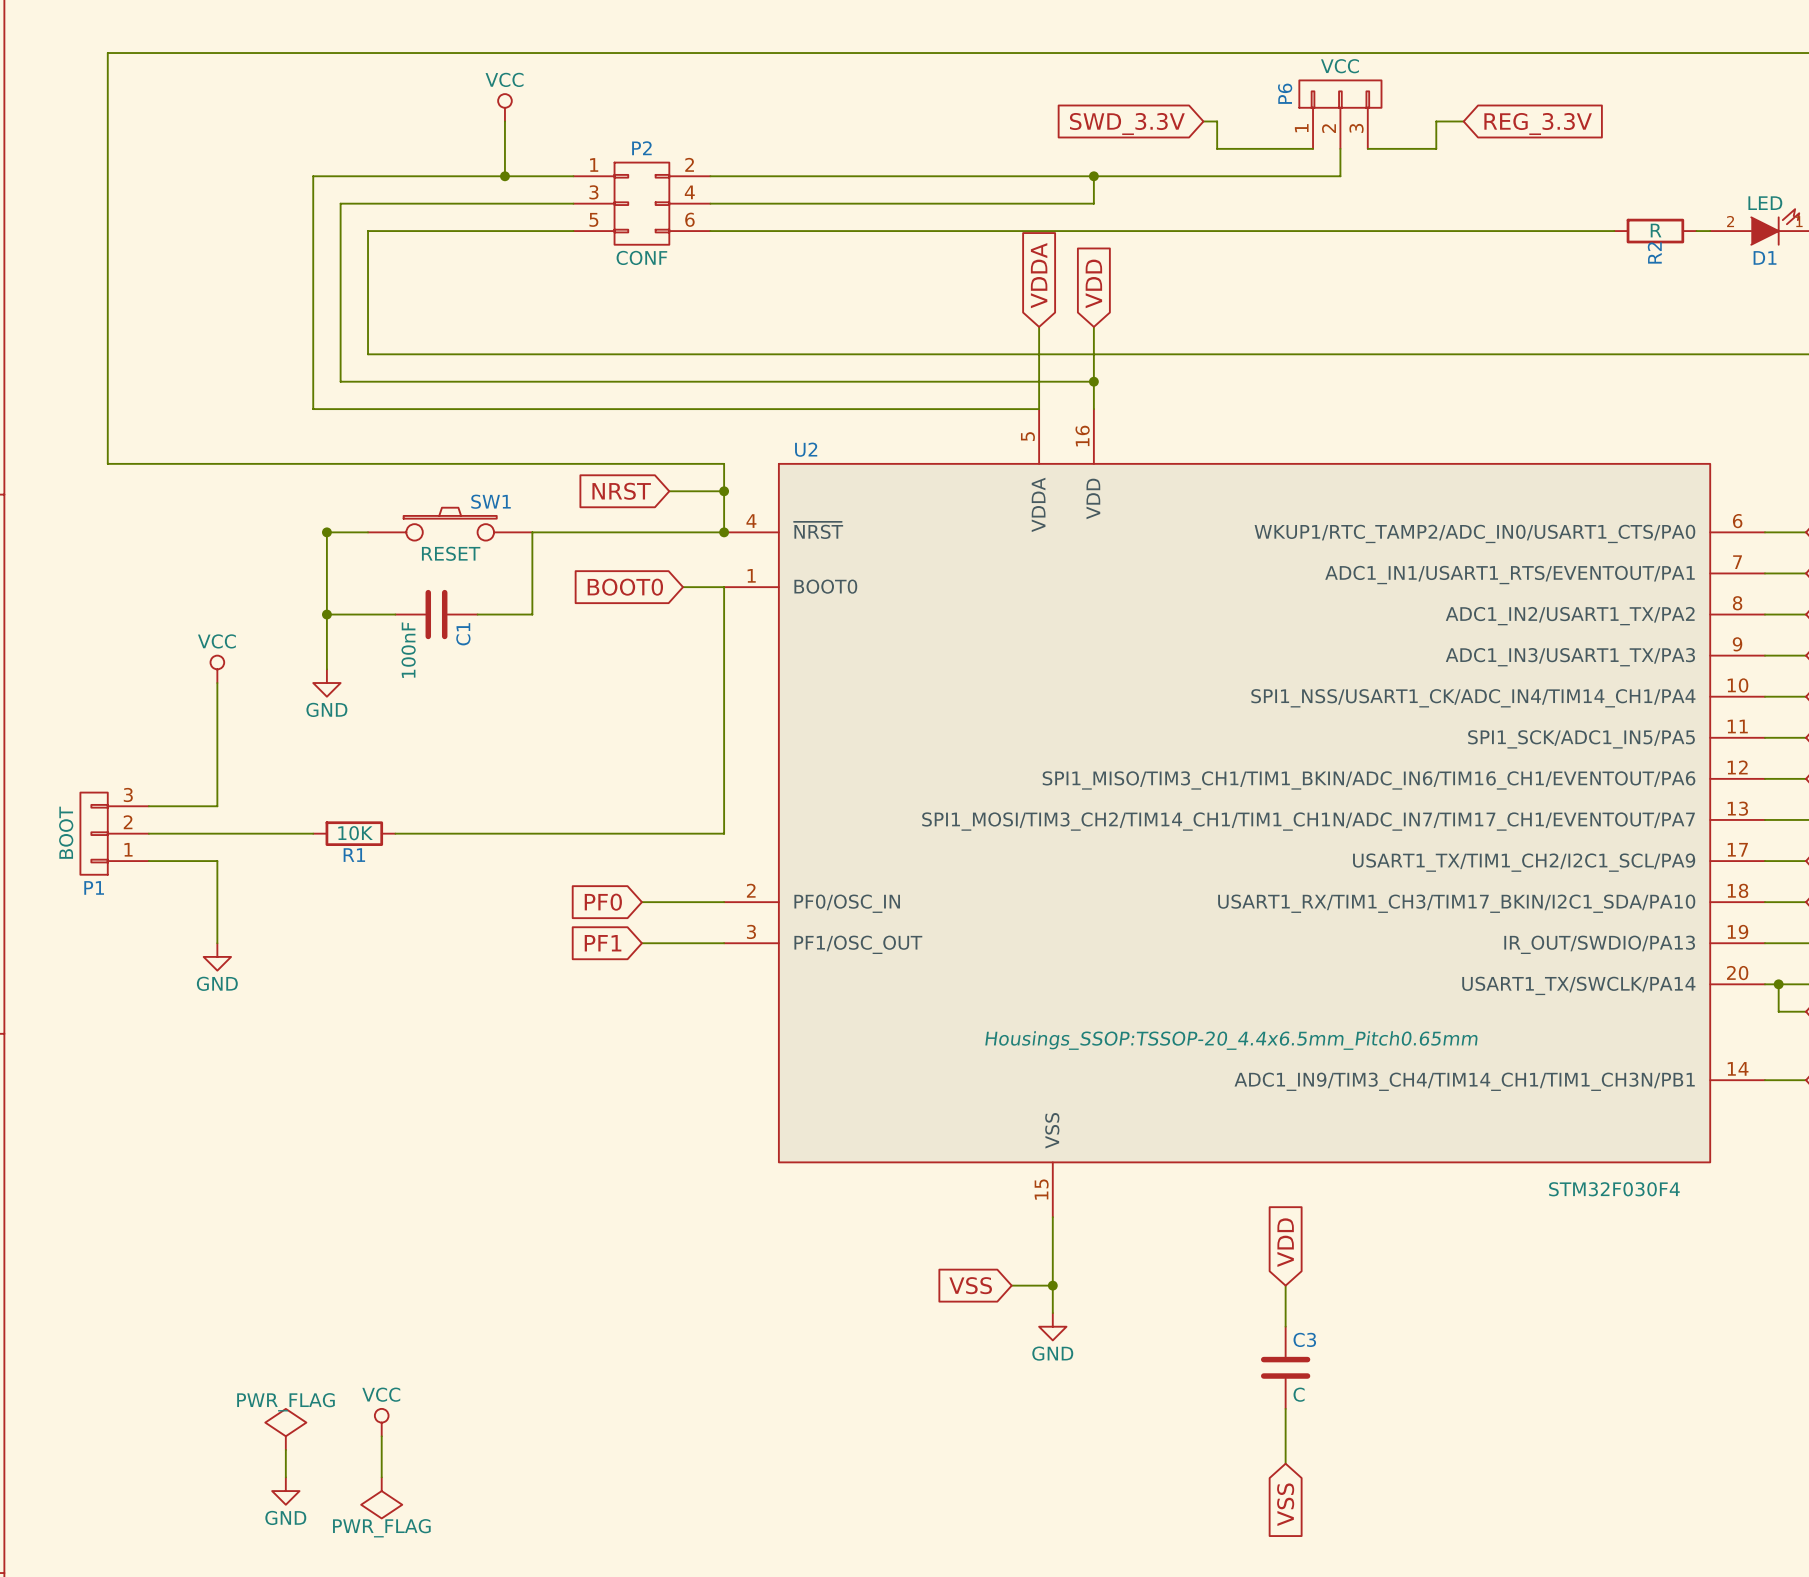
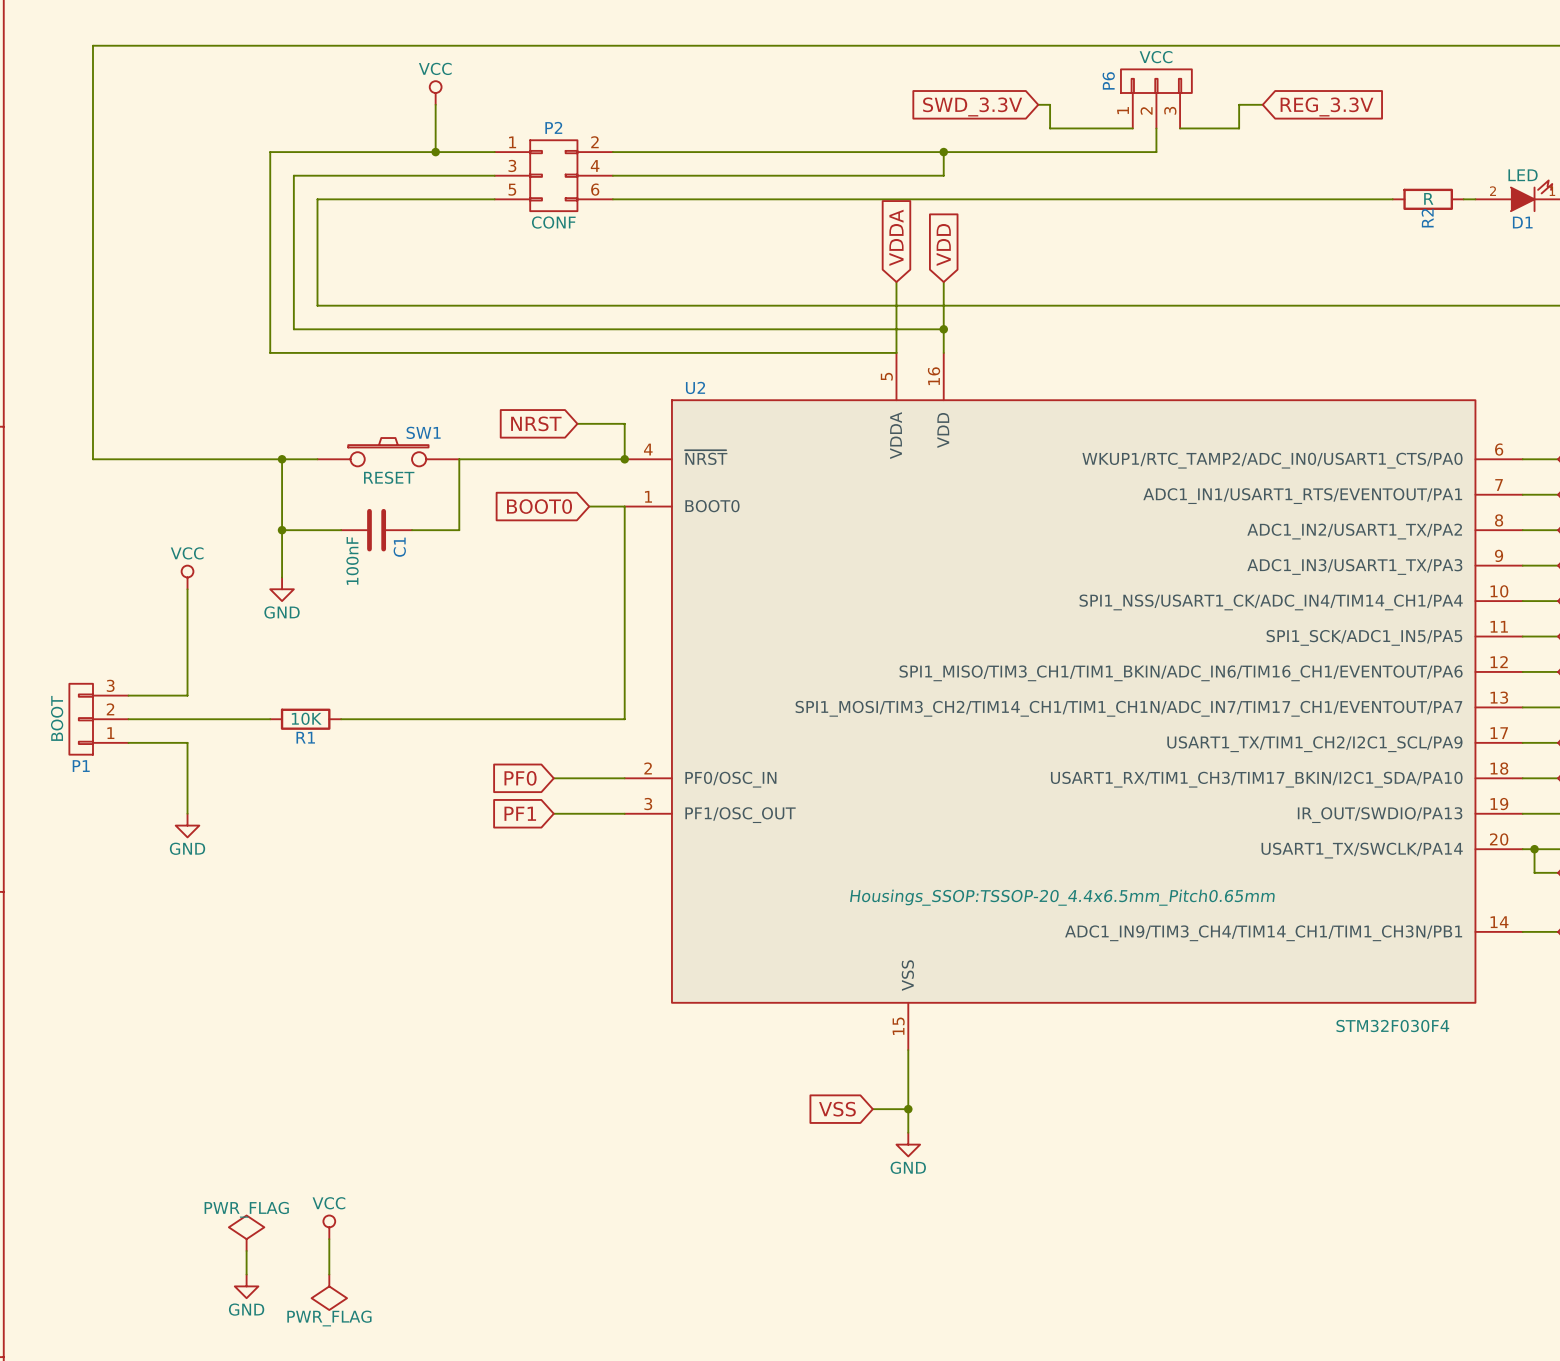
wire: (107, 463) (724, 463) (724, 491) -> (92, 400) (92, 459) (282, 459)
junction: (724, 491) -> none
global label: VDD (1285, 1242) -> none
wire: (1285, 1285) (1285, 1326) -> none
C3: C (1285, 1367) -> none
wire: (1285, 1408) (1285, 1463) -> none
global label: VSS (1285, 1504) -> none

